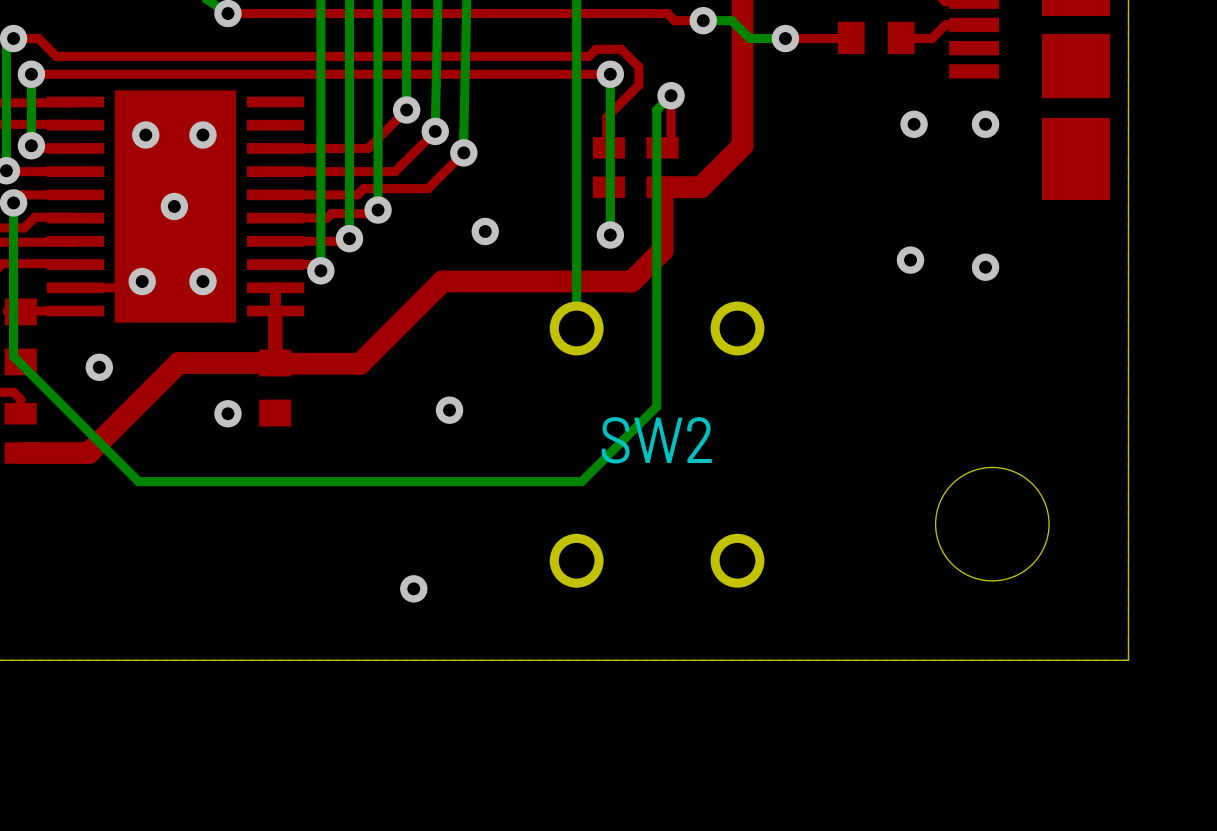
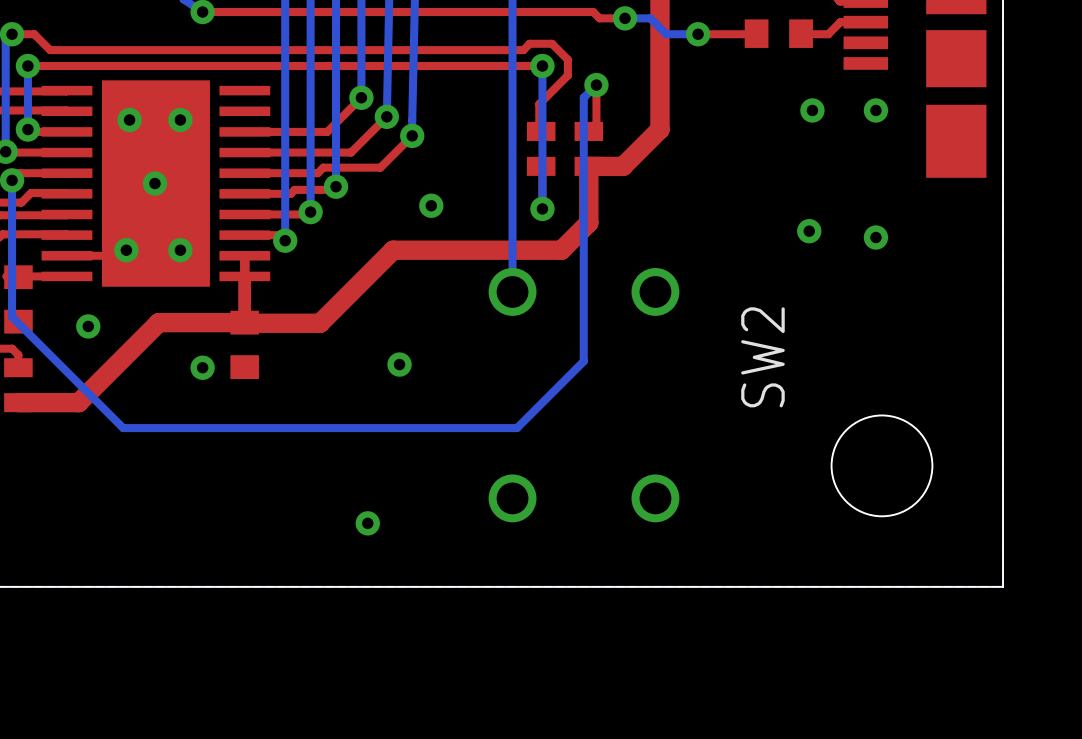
SW2 name rotation: 0° (656, 440) -> 90° counterclockwise (762, 357)
SW2 name position: SW2 (656, 440) -> SW2 (762, 357)

